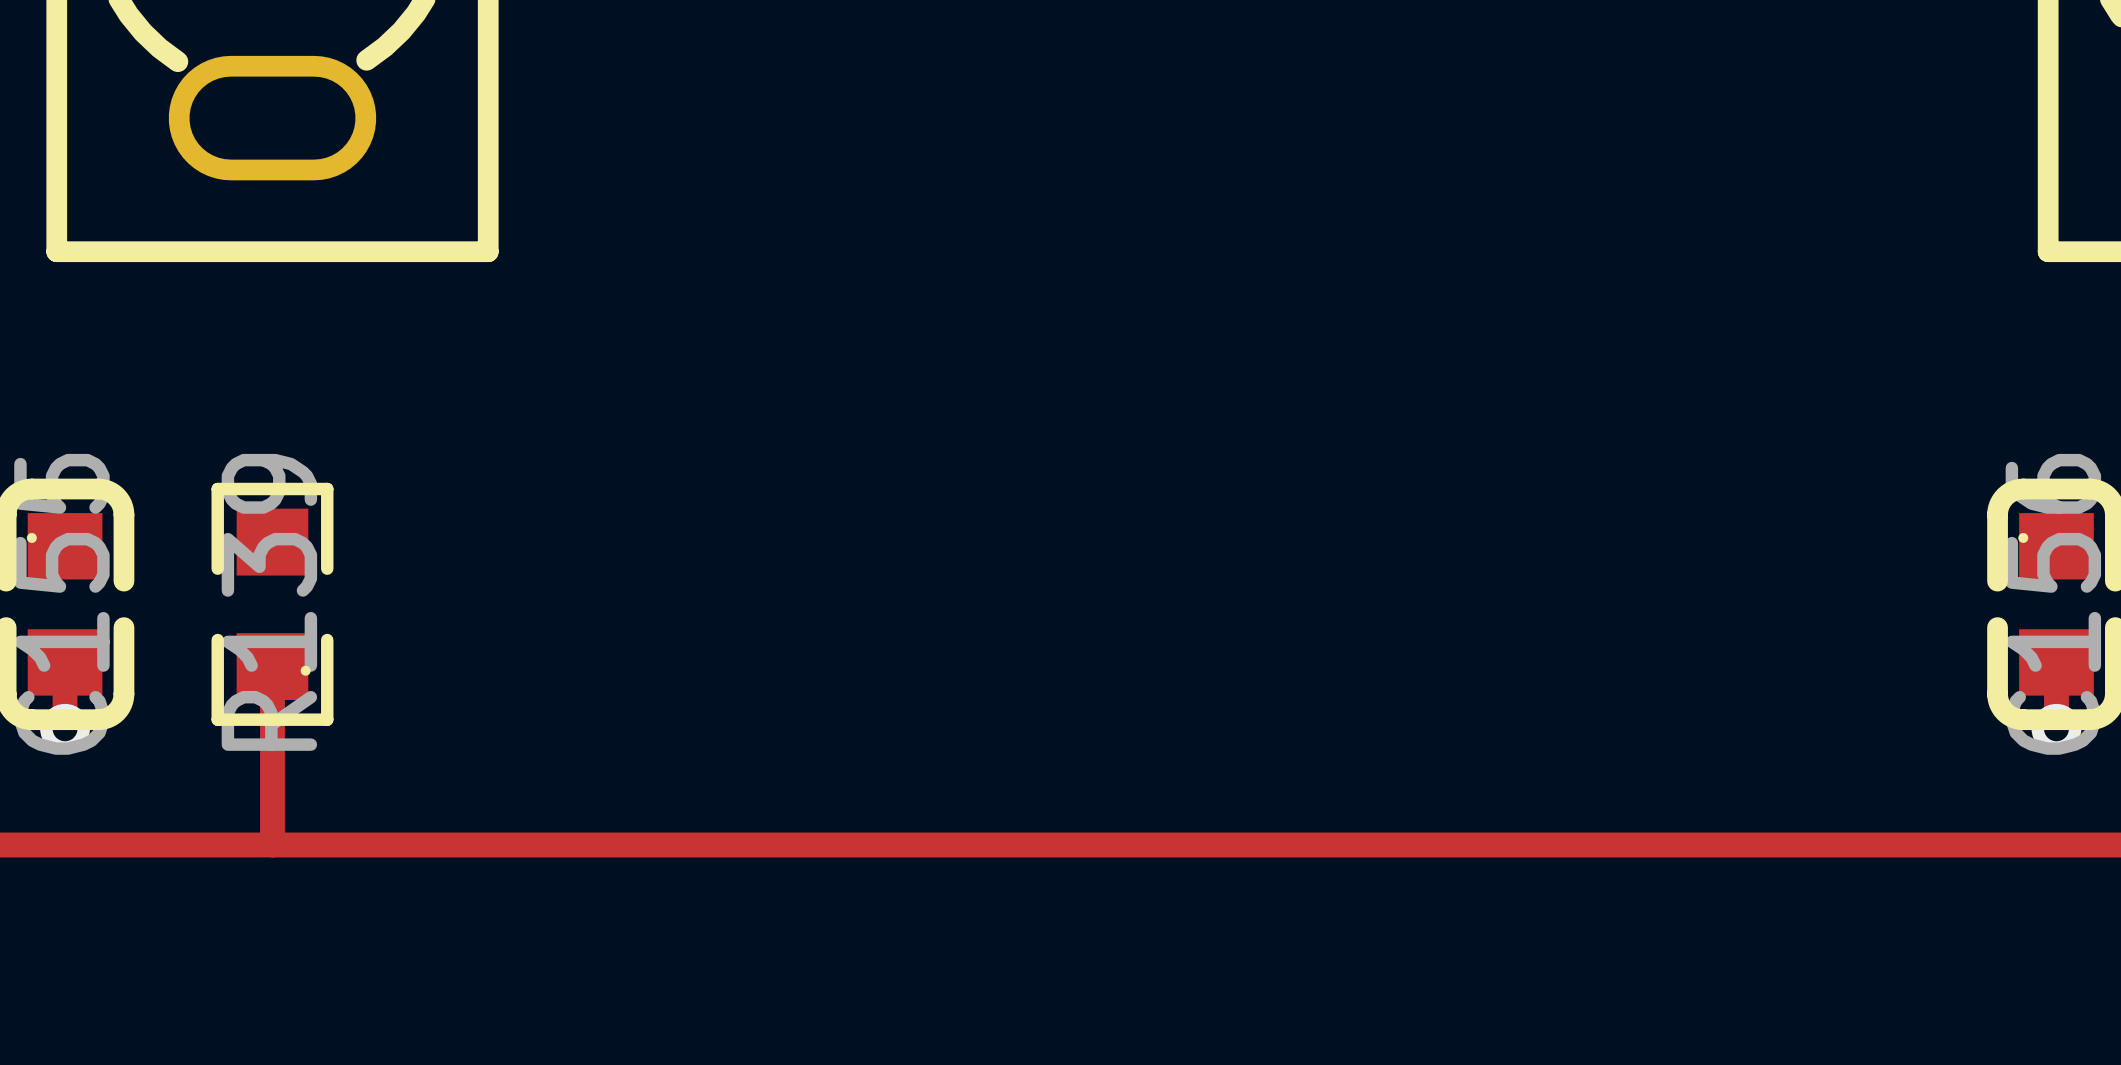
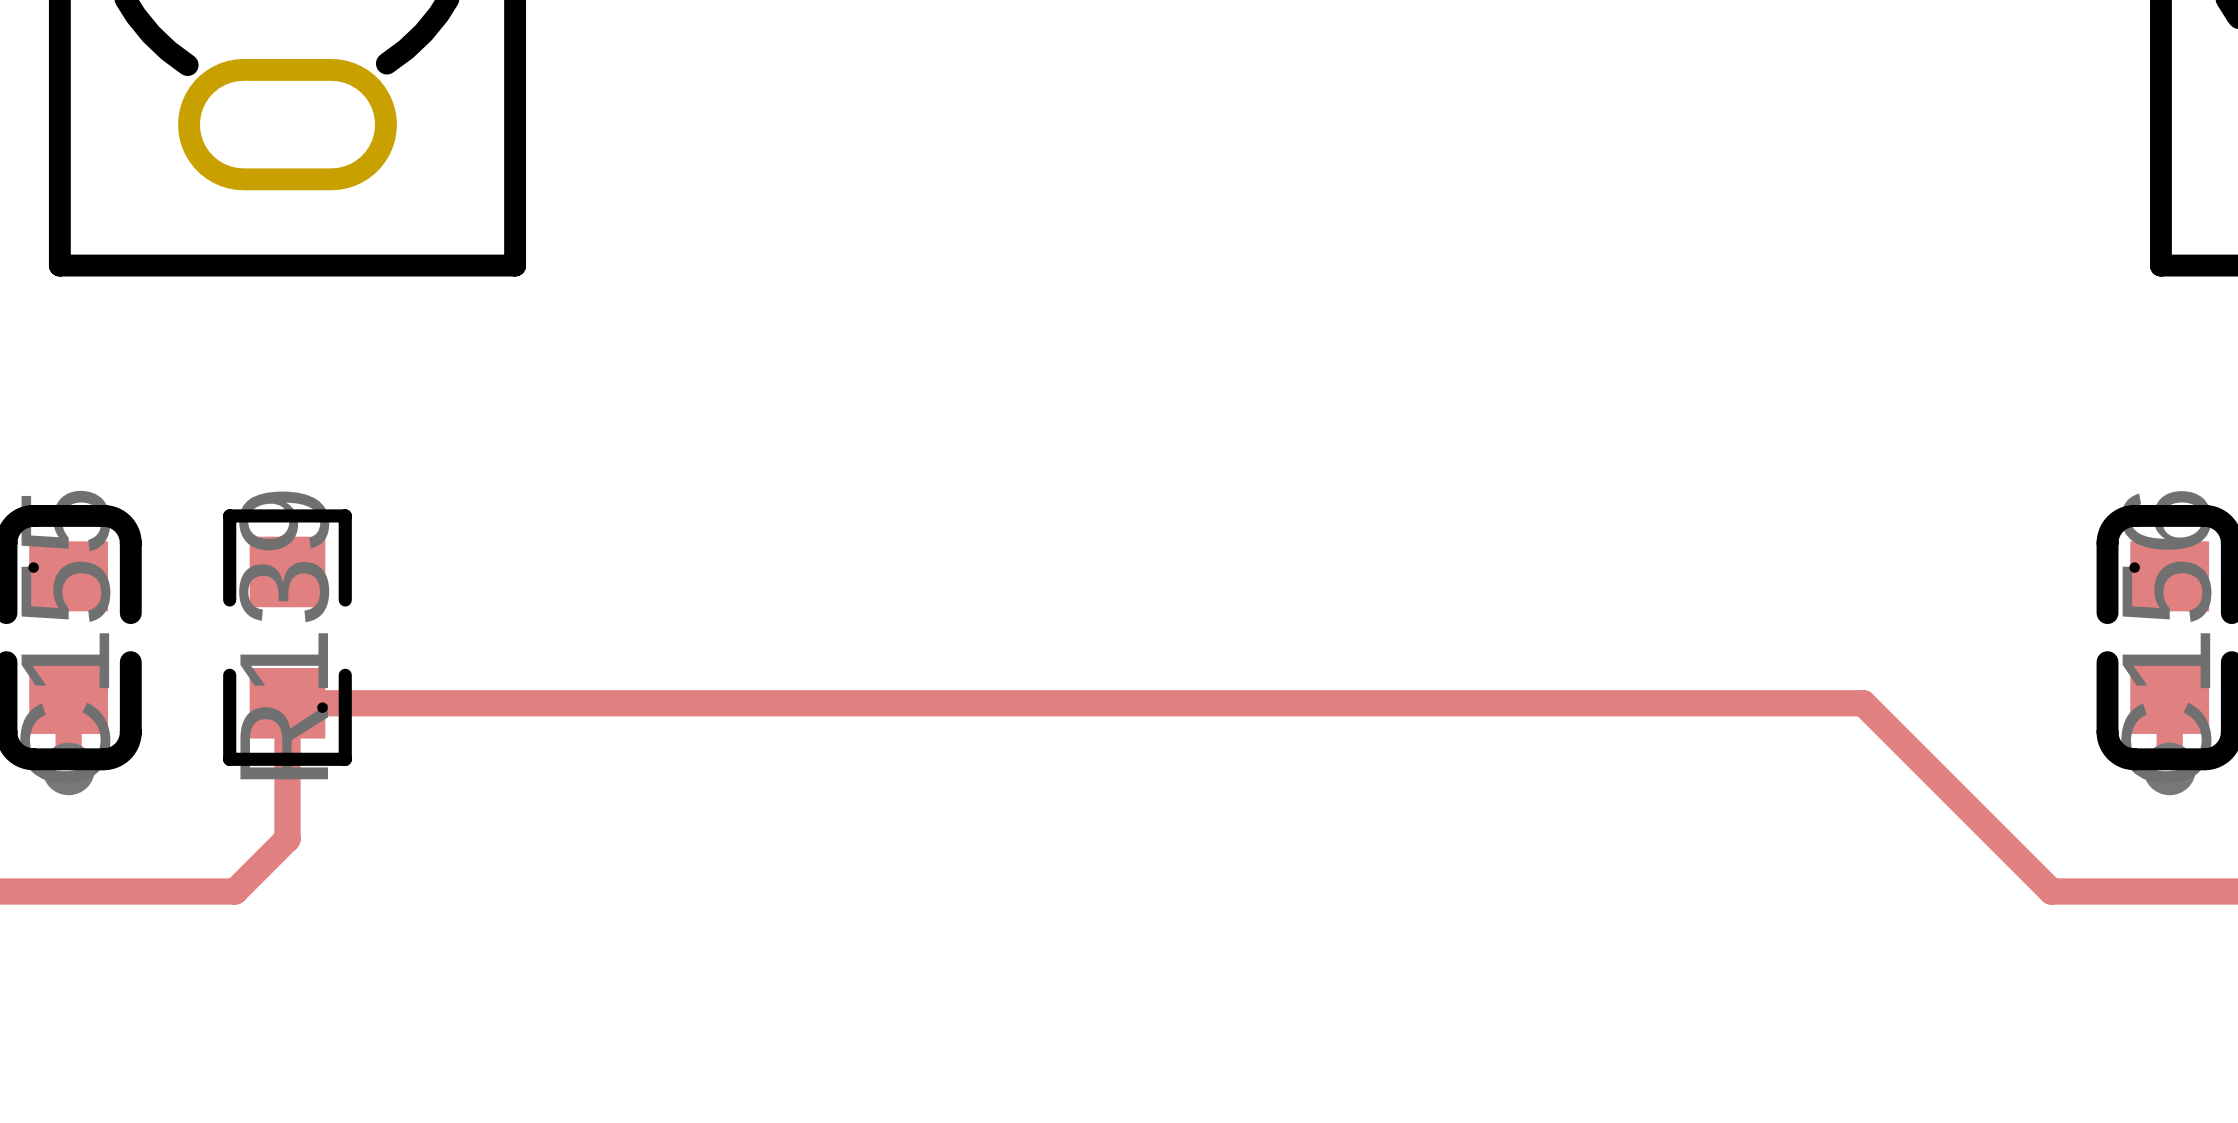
track: (272, 795) (272, 844) -> (287, 838) (234, 891)
track: (222, 844) (1944, 844) -> (287, 703) (1863, 703) (2051, 891)

